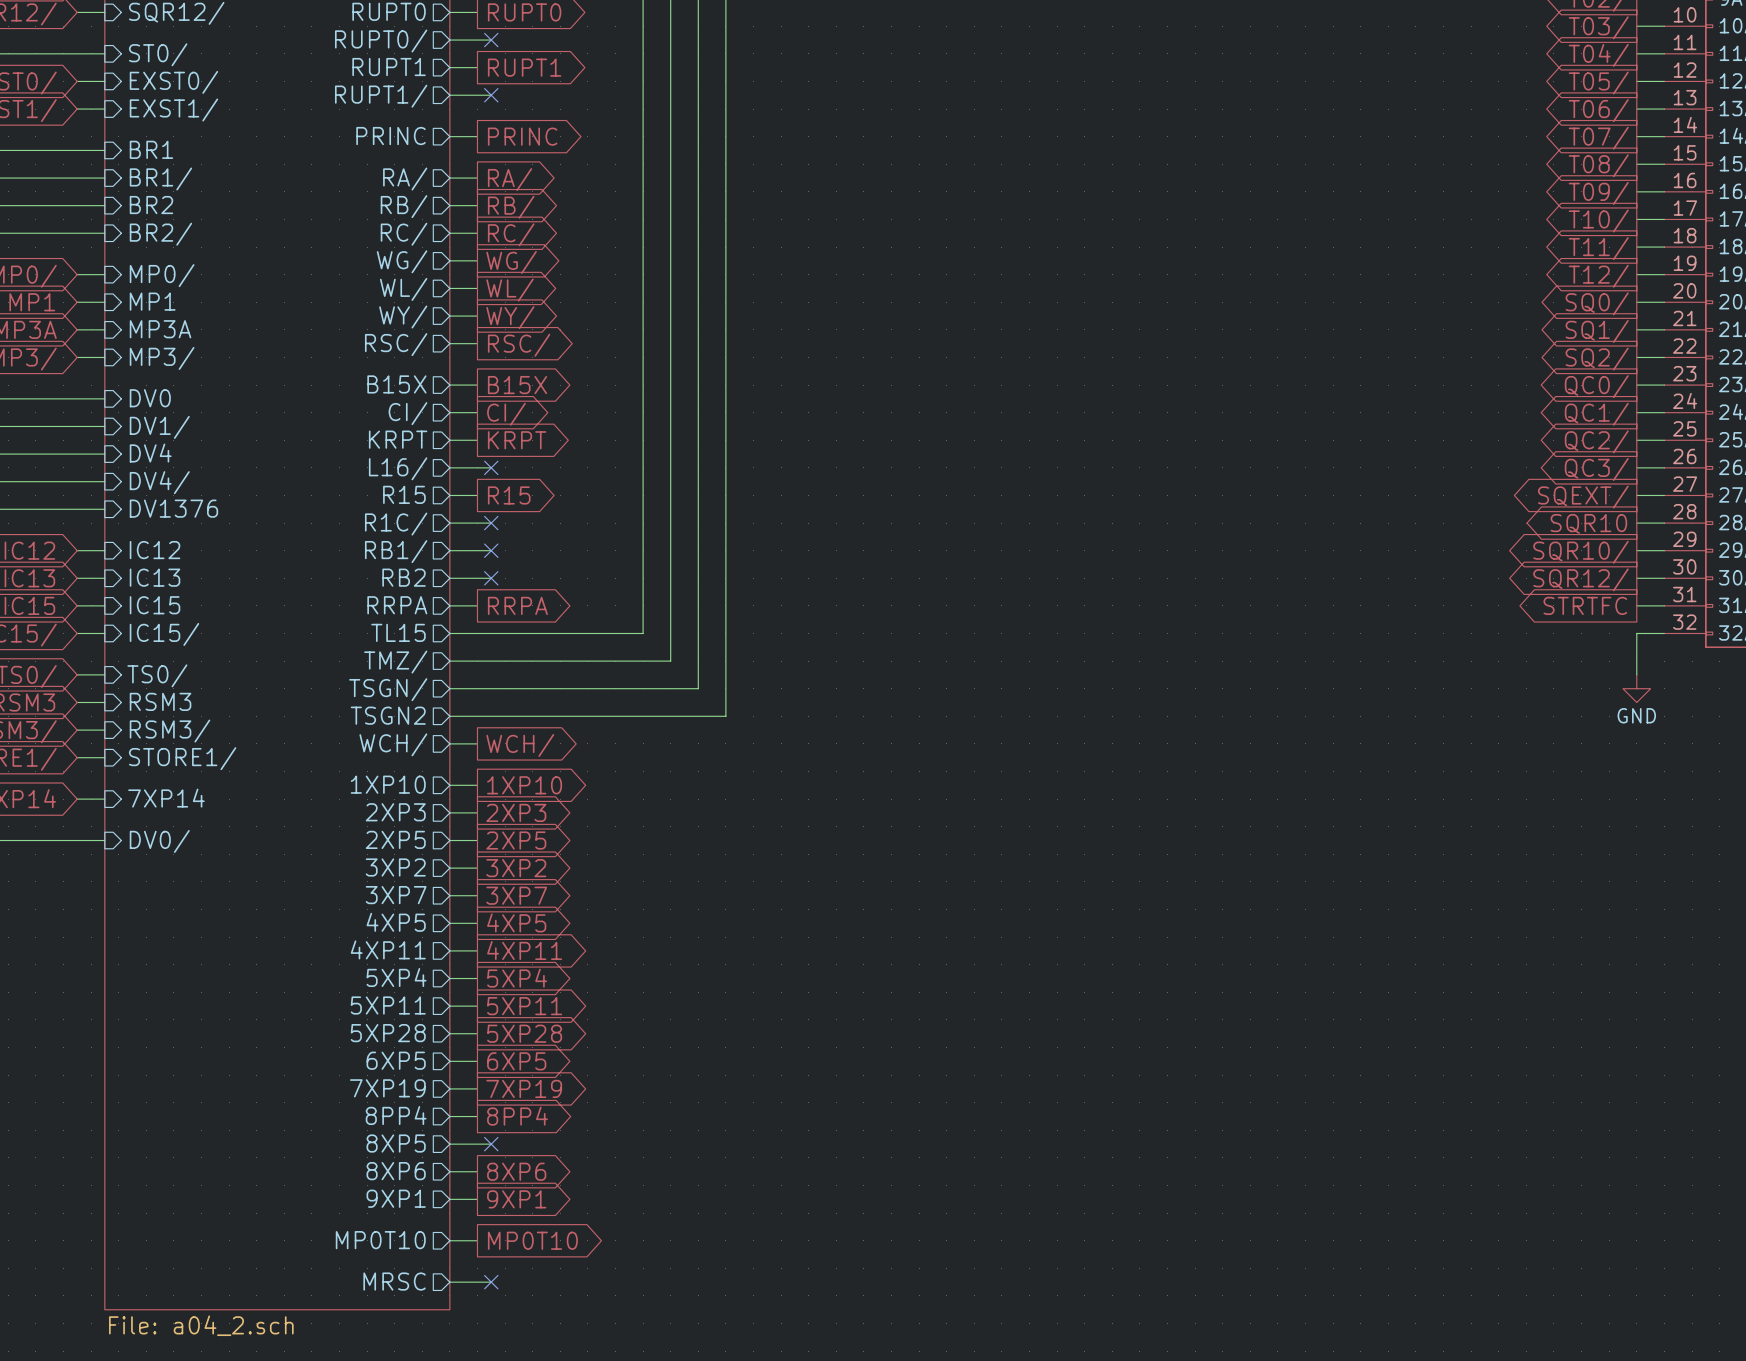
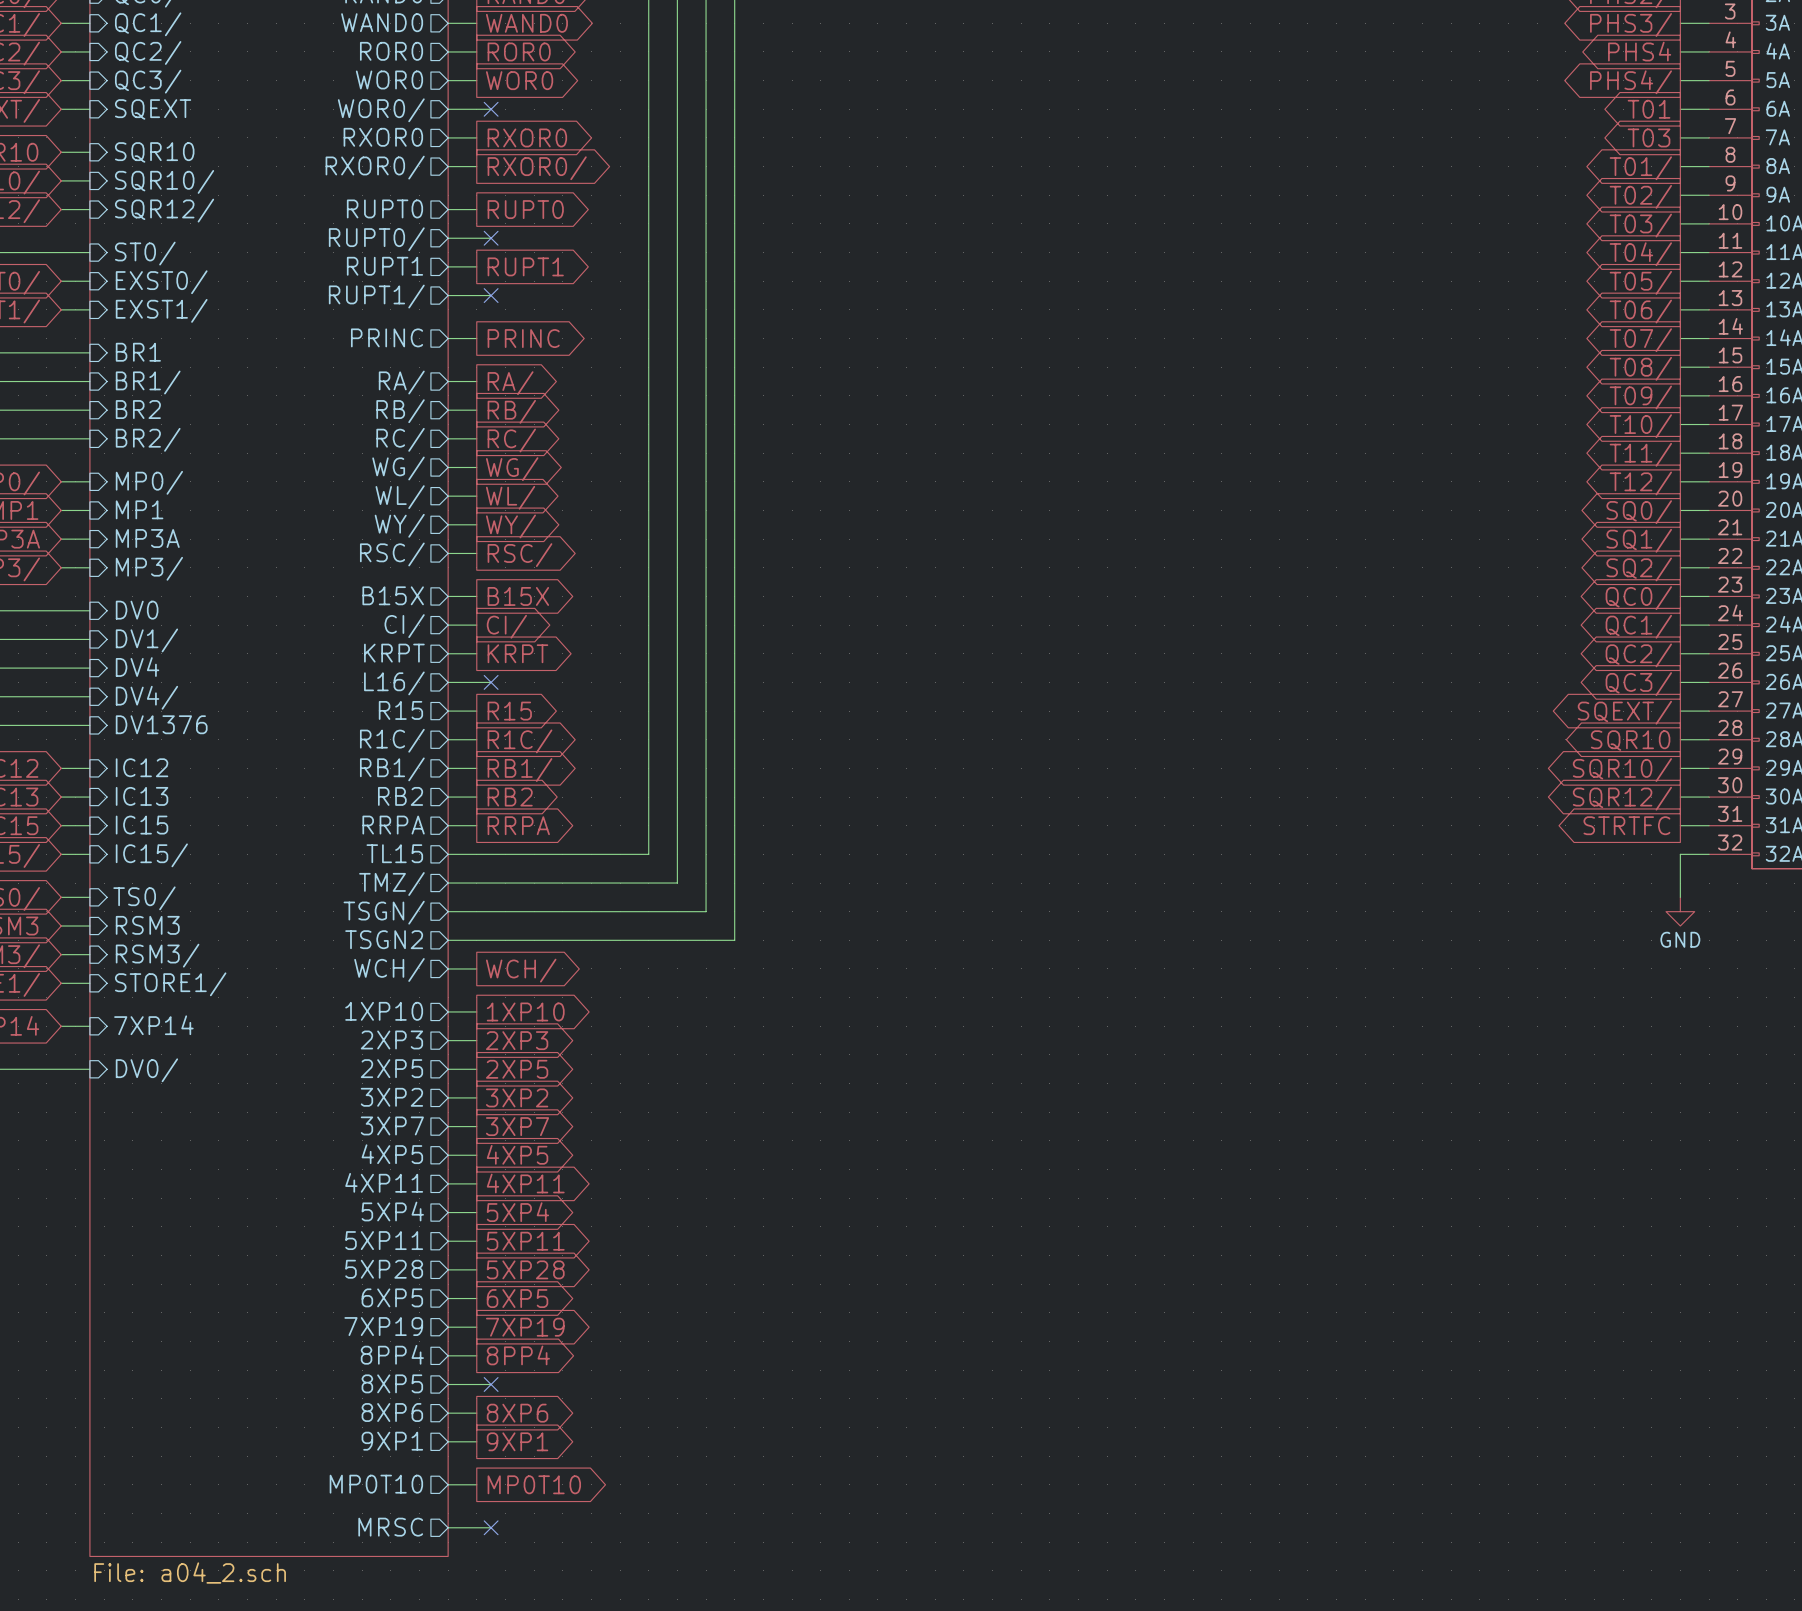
wire: (477, 523) (491, 523) -> none
no-connect mark: (491, 523) -> none
global label: none -> R1C/ (519, 741)
wire: (477, 550) (491, 550) -> none
no-connect mark: (491, 550) -> none
global label: none -> RB1/ (519, 770)
wire: (477, 578) (491, 578) -> none
no-connect mark: (491, 578) -> none
global label: none -> RB2 (510, 797)

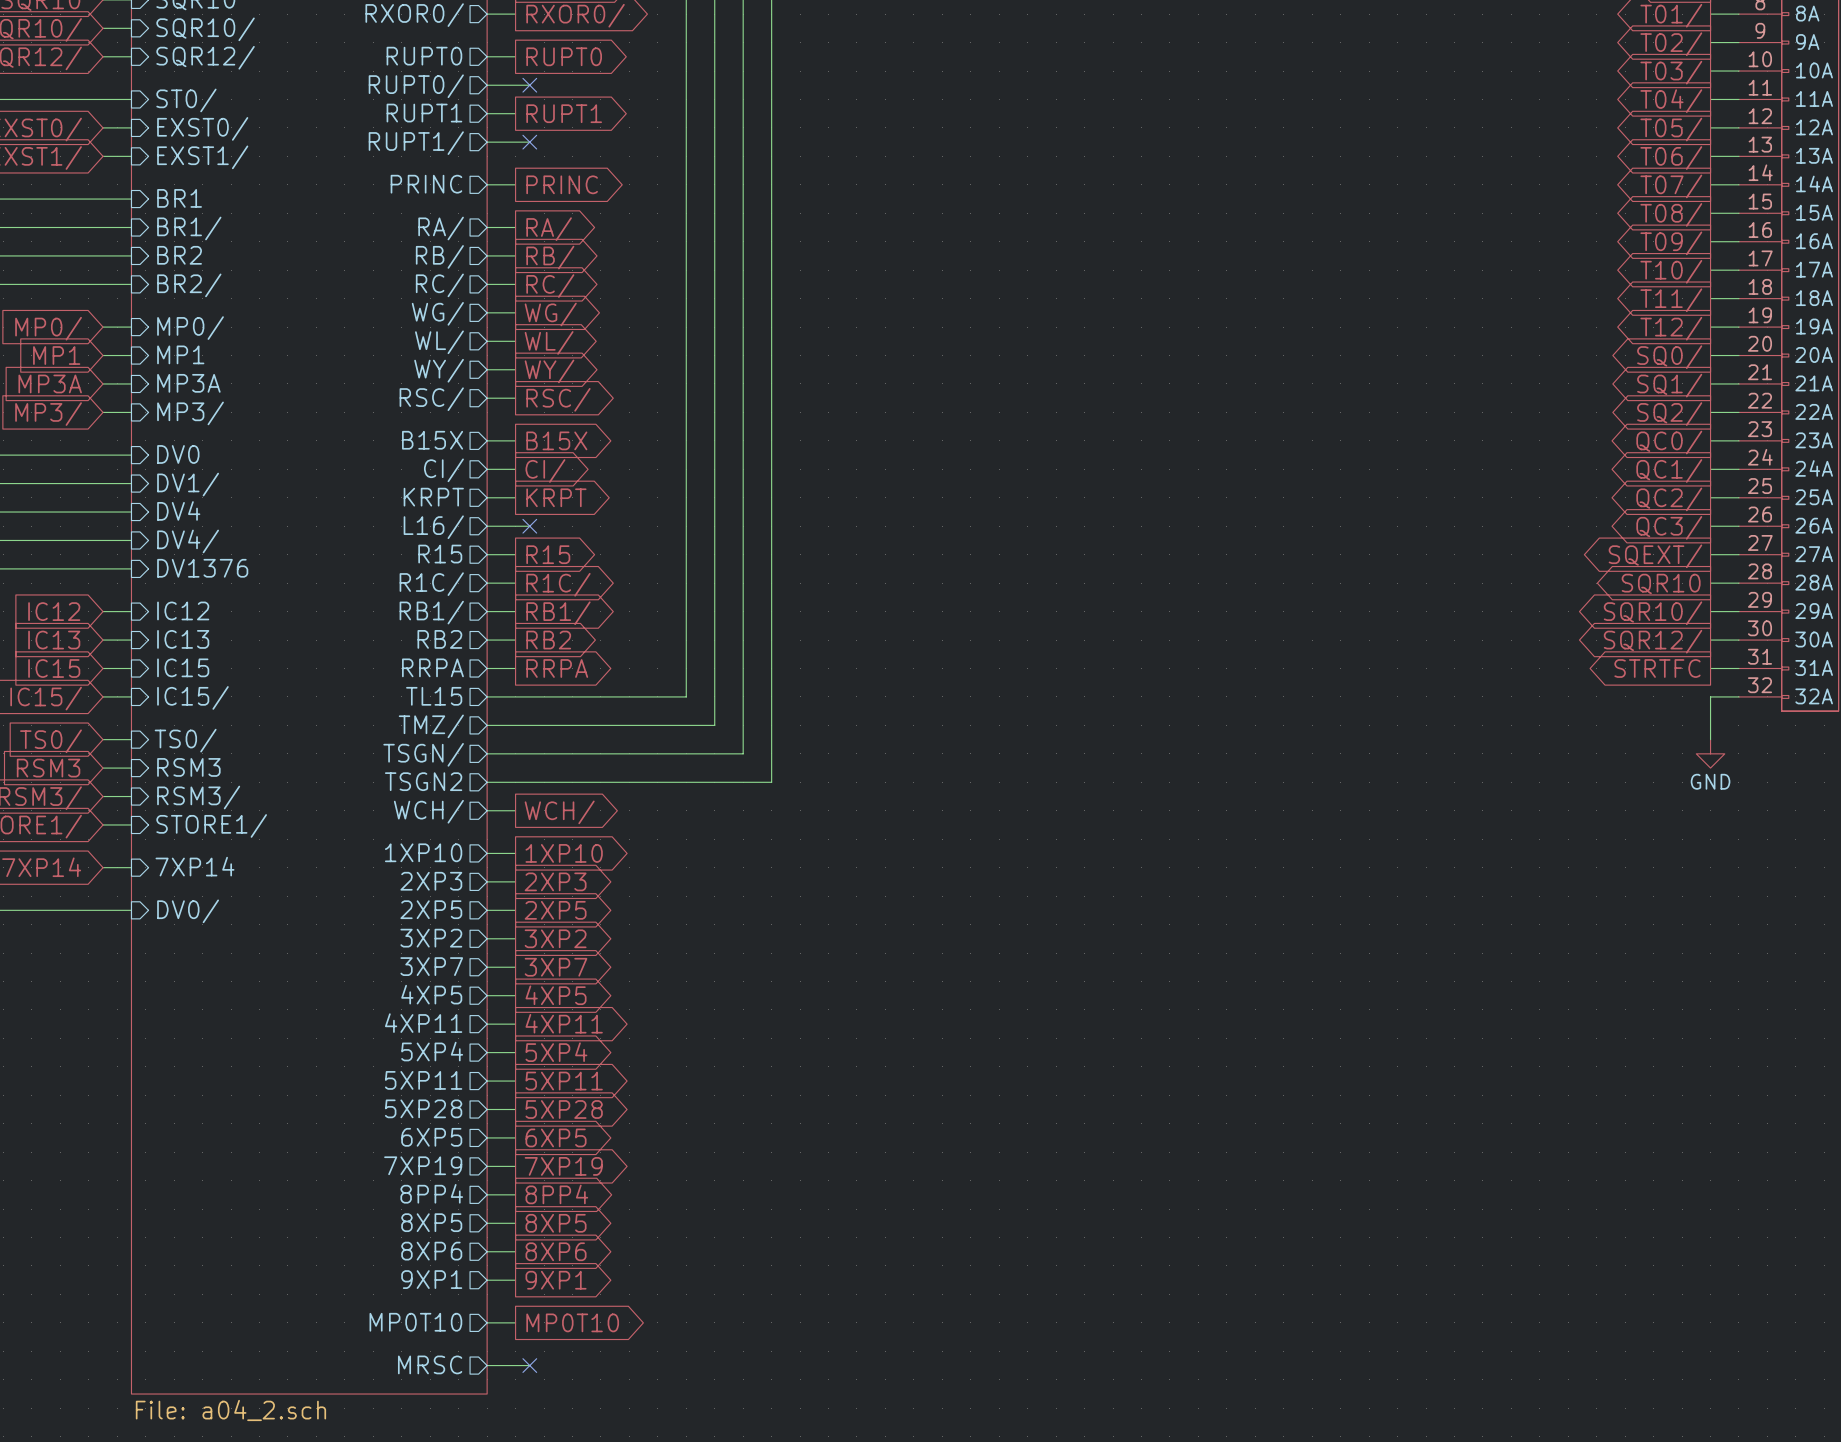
wire: (476, 1384) (491, 1384) -> none
no-connect mark: (491, 1384) -> none
global label: none -> 8XP5 (556, 1223)

